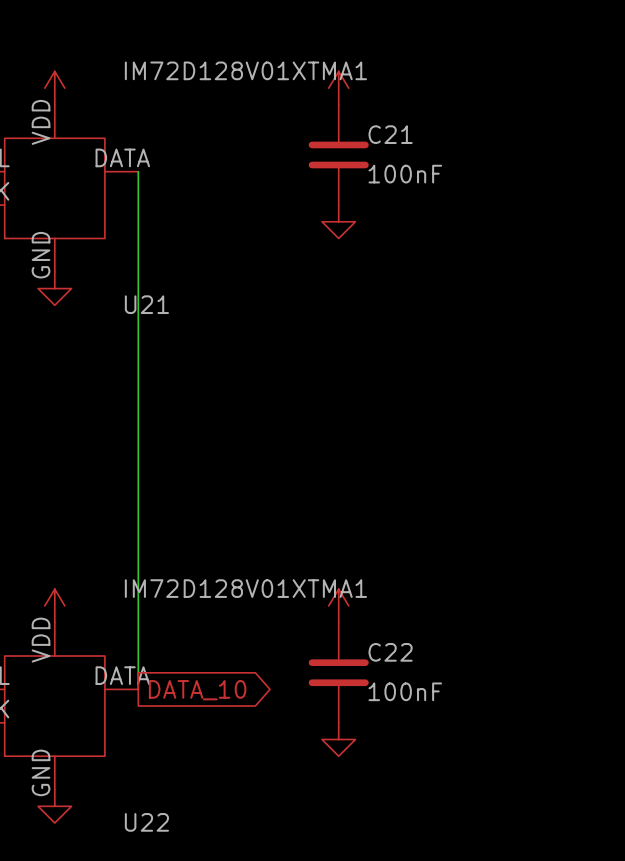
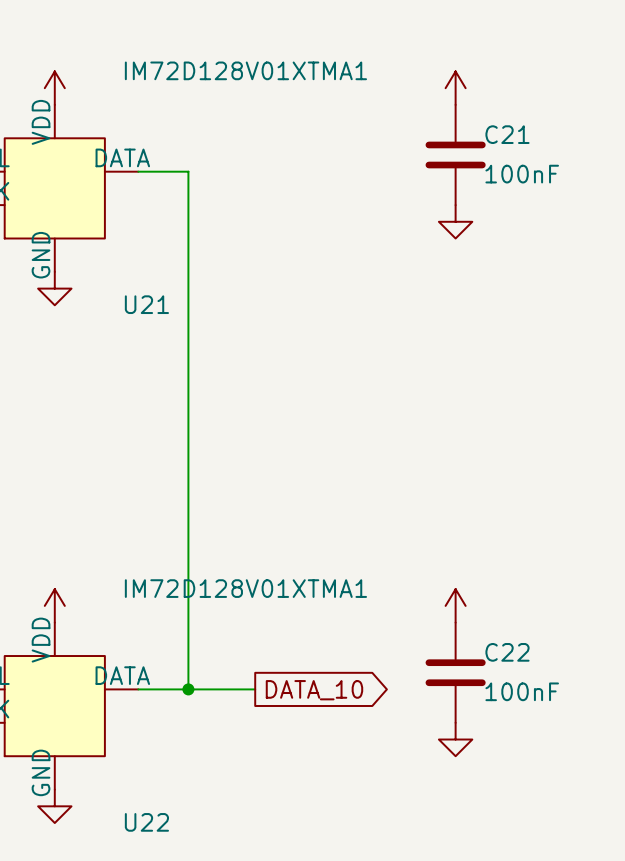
power symbol position: (338, 88) -> (455, 88)
C21 position: (338, 154) -> (455, 154)
wire: (138, 171) (138, 689) -> (138, 171) (188, 171) (188, 689)
power symbol position: (338, 221) -> (455, 221)
power symbol position: (338, 605) -> (455, 605)
C22 position: (338, 672) -> (455, 672)
wire: none -> (138, 689) (255, 689)
junction: none -> (188, 689)
global label position: DATA_10 (197, 690) -> DATA_10 (314, 690)
power symbol position: (338, 739) -> (455, 739)

